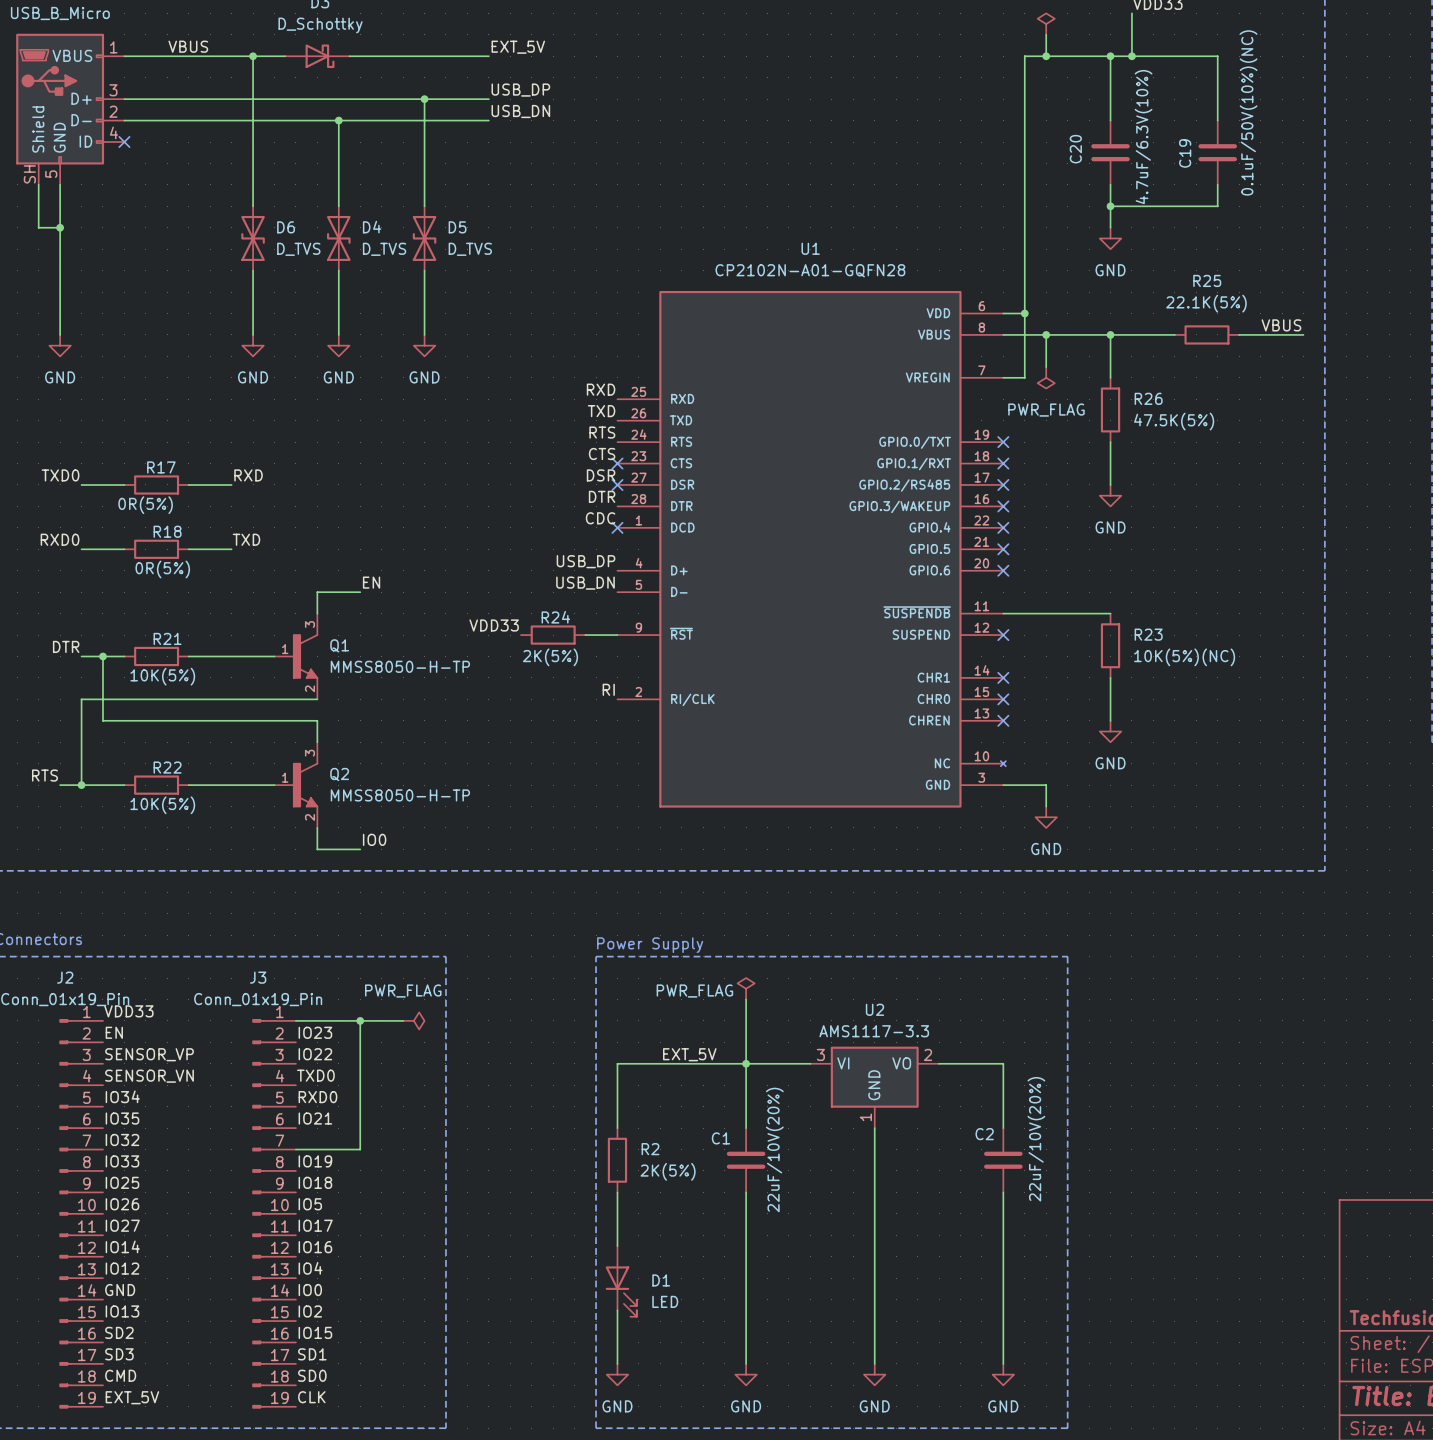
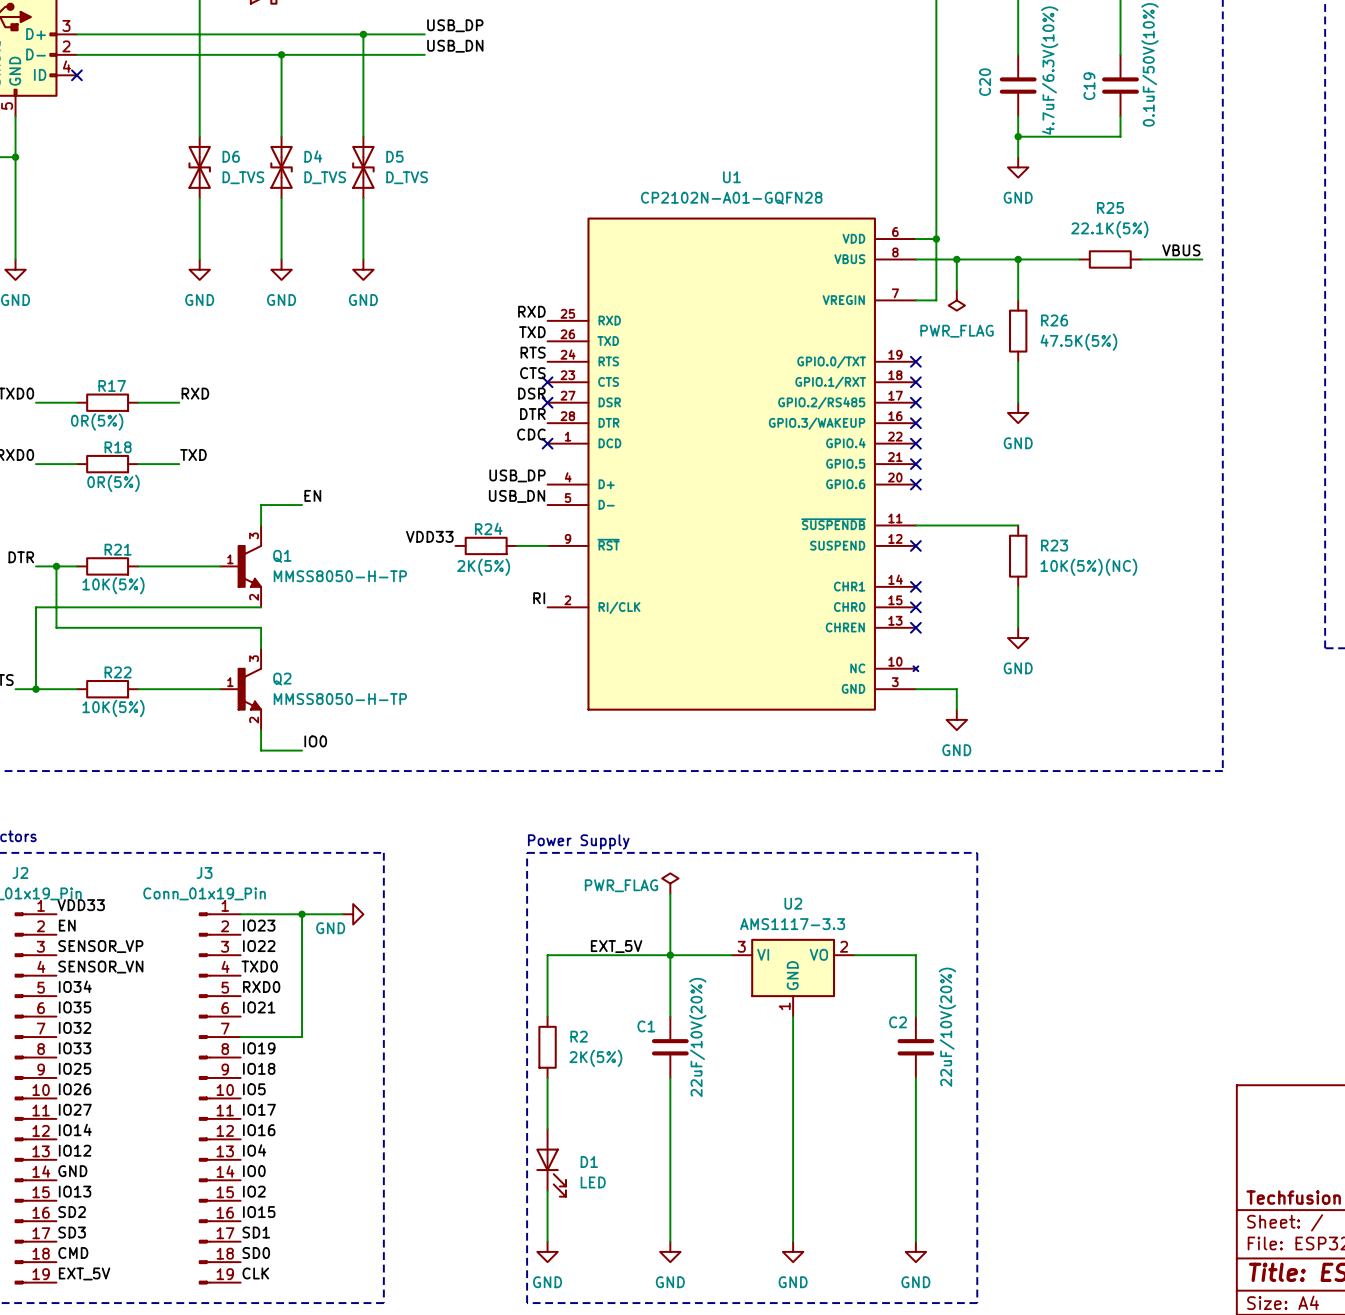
power symbol: PWR_FLAG (413, 1020) -> GND (353, 914)

